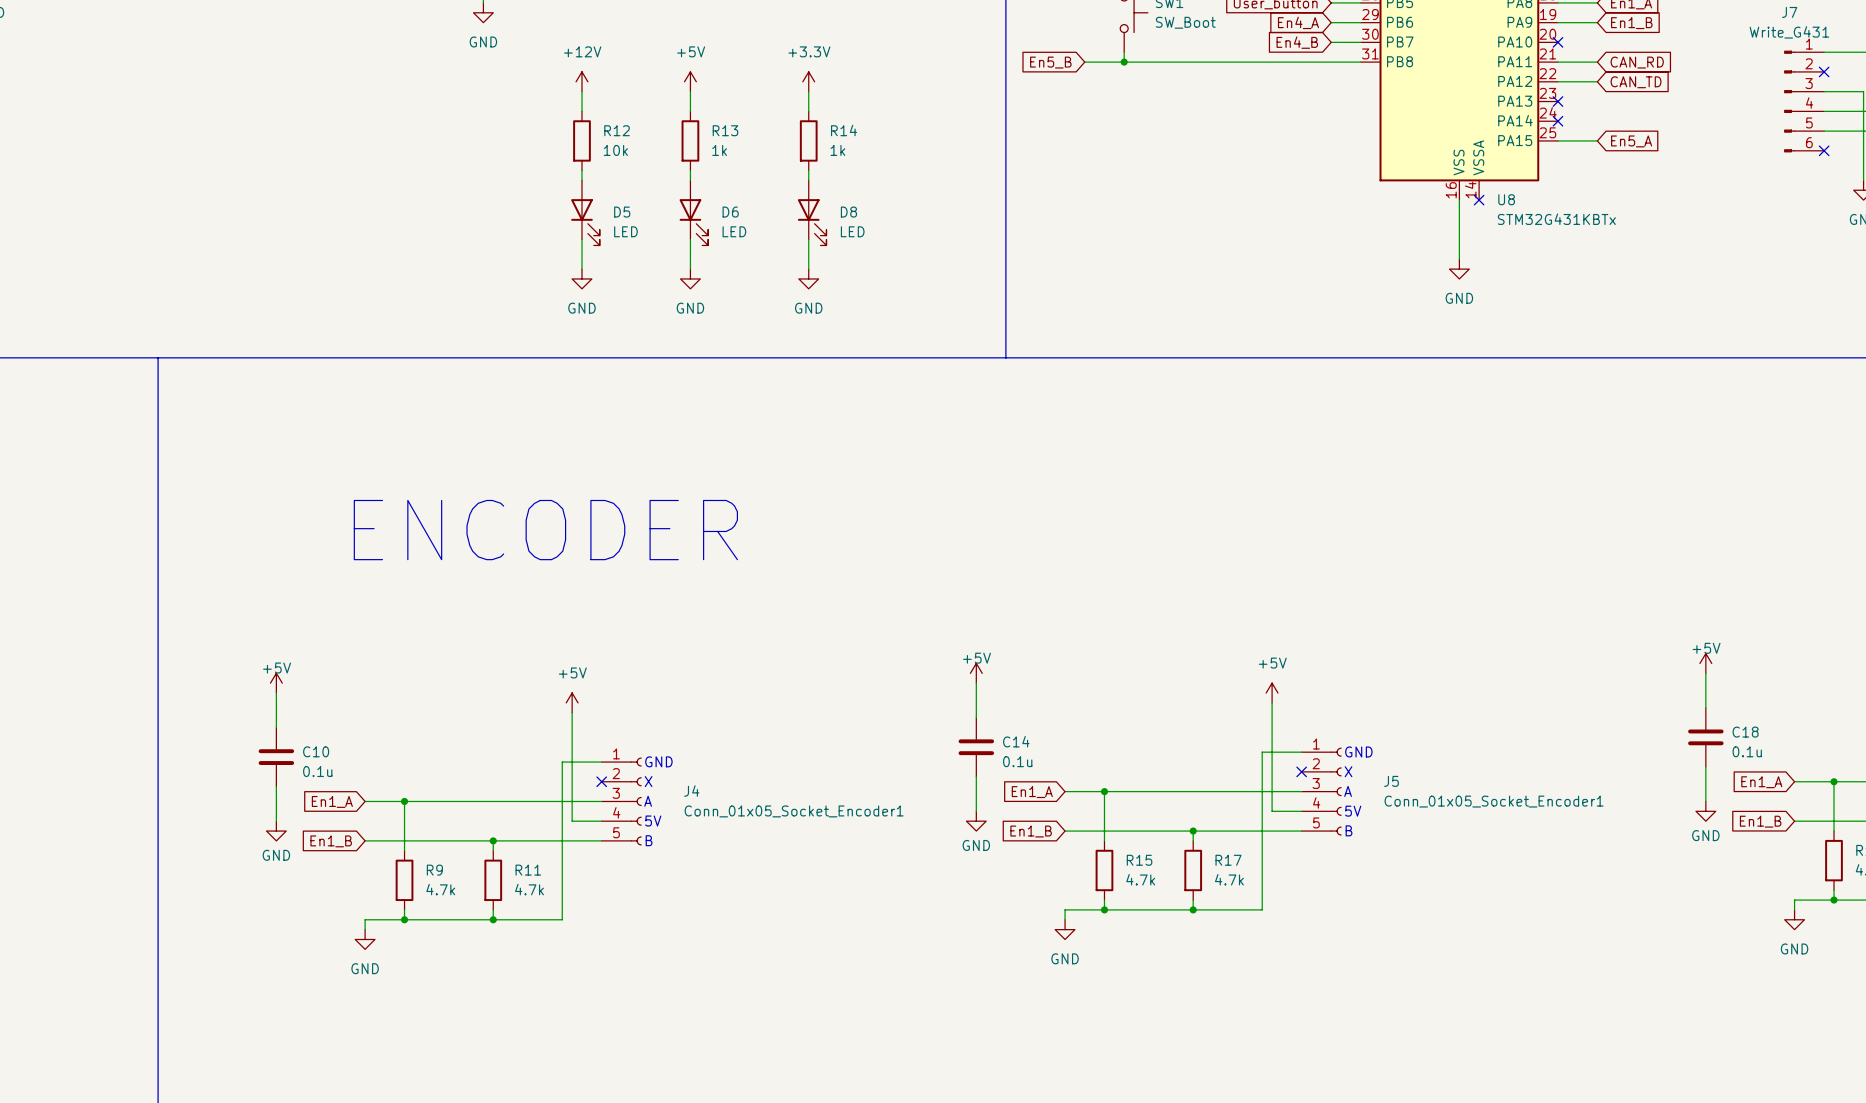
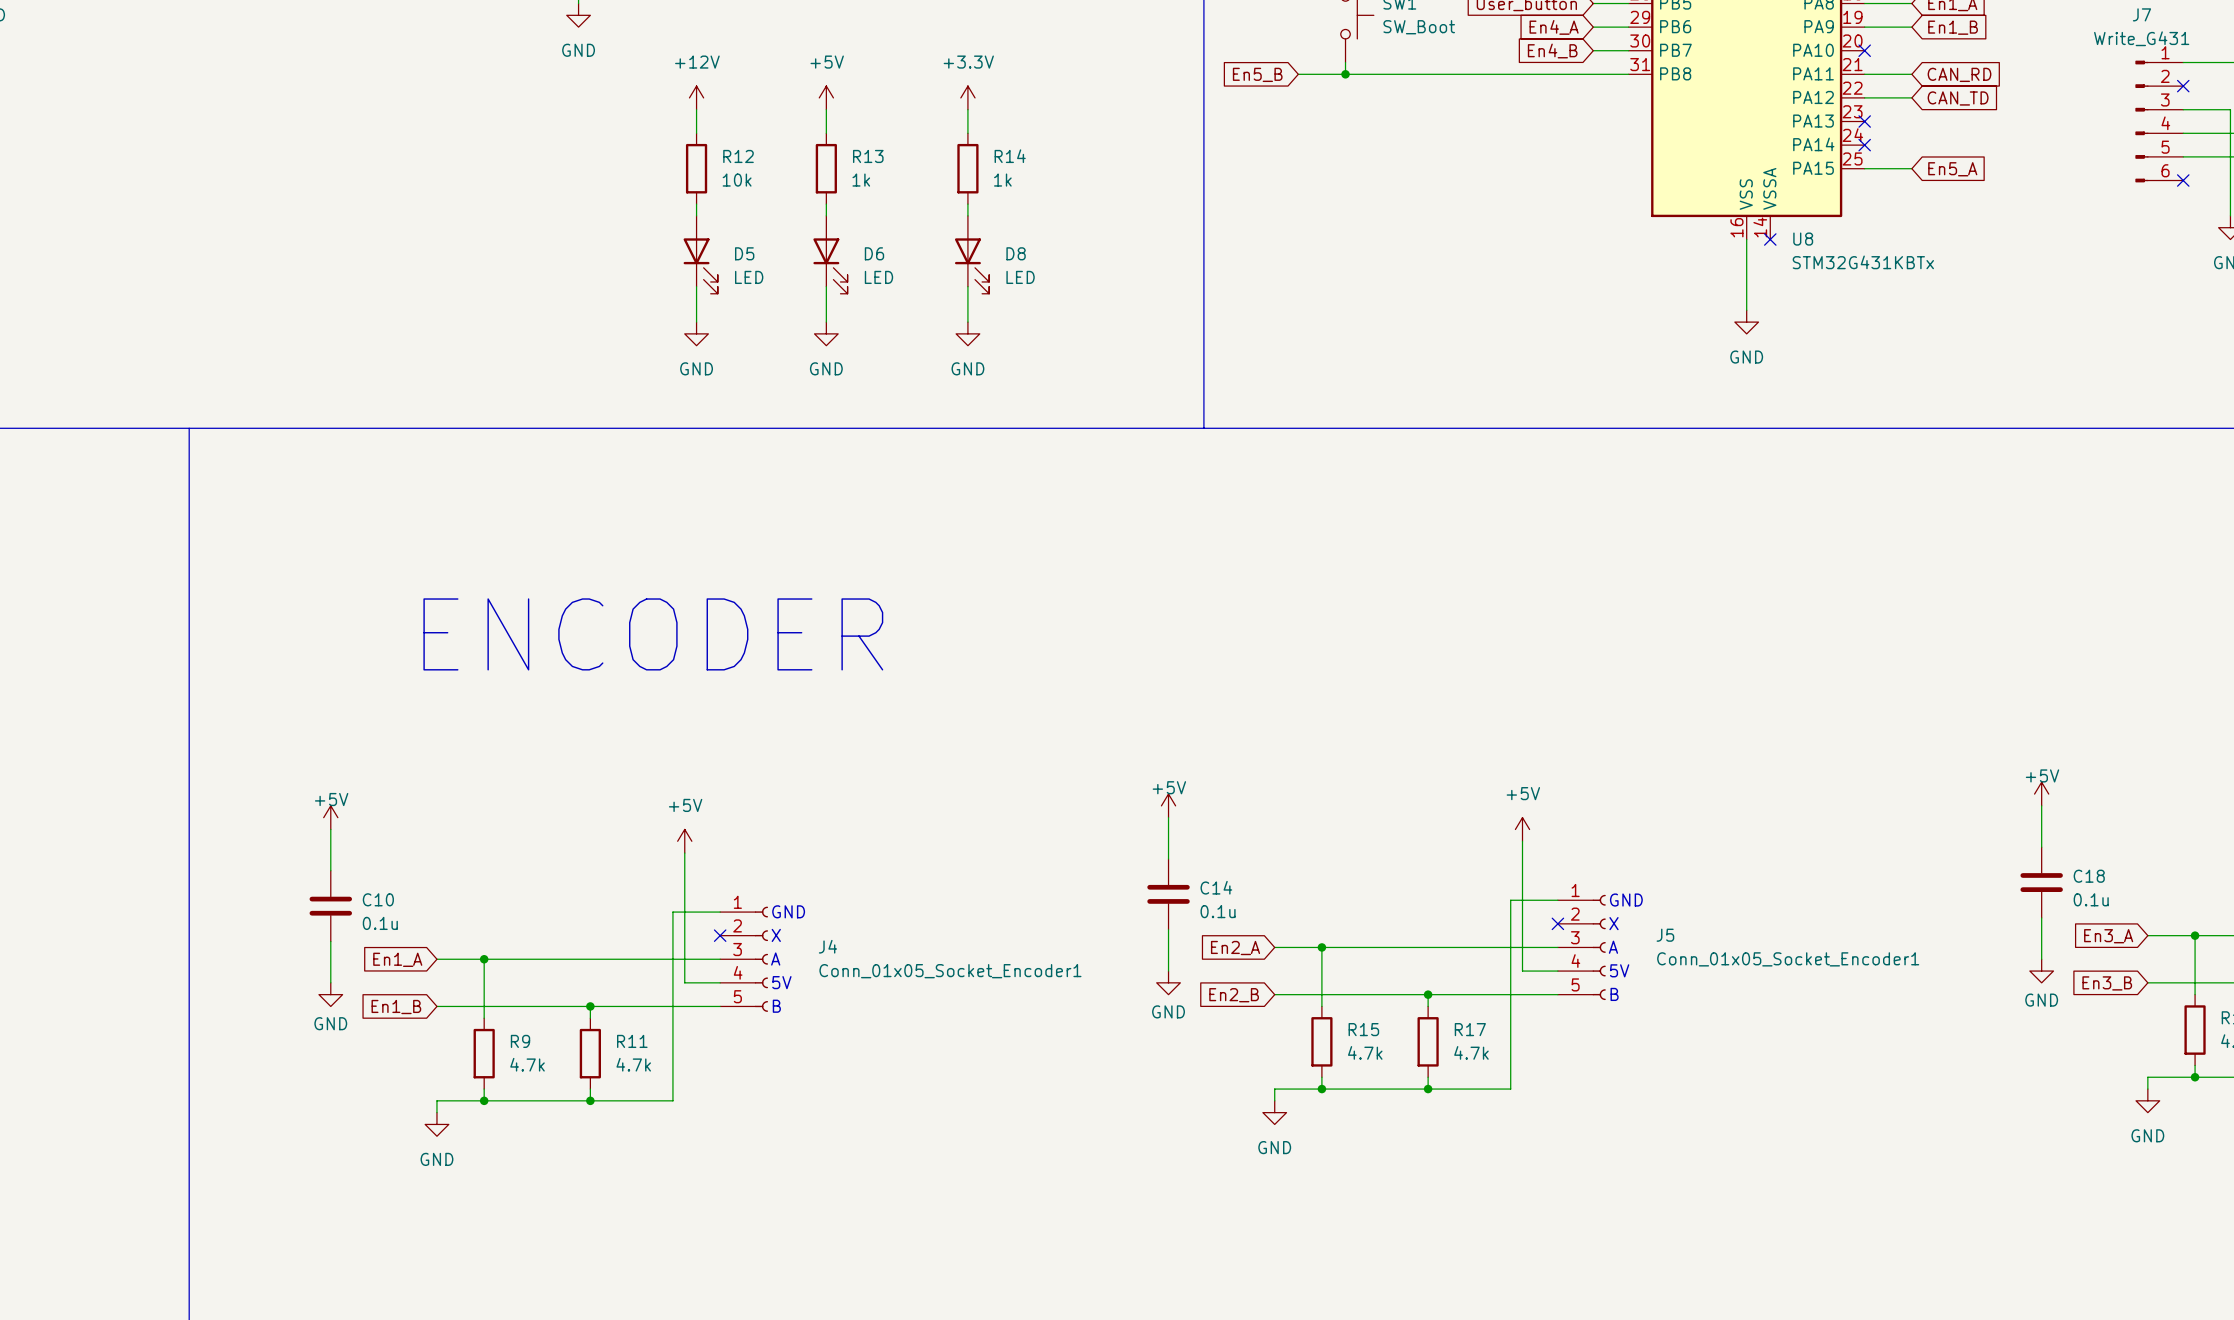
global label: En1_A (1761, 782) -> En3_A (2108, 936)
global label: En1_A (1032, 792) -> En2_A (1235, 948)
global label: En1_B (1760, 821) -> En3_B (2107, 983)
global label: En1_B (1031, 831) -> En2_B (1234, 995)

